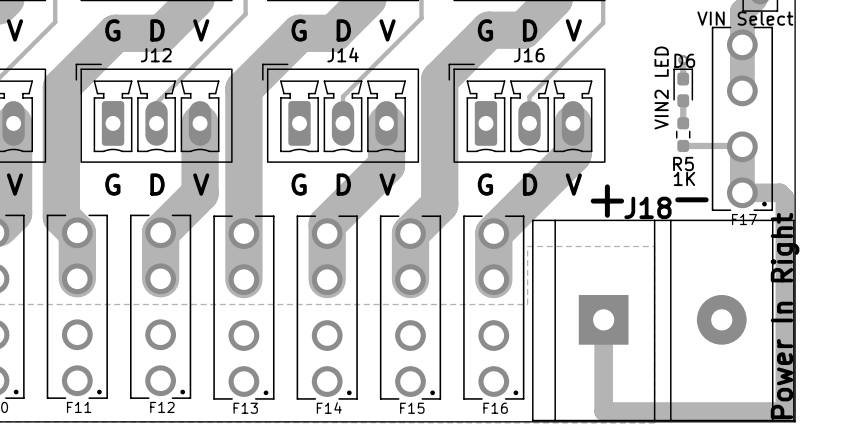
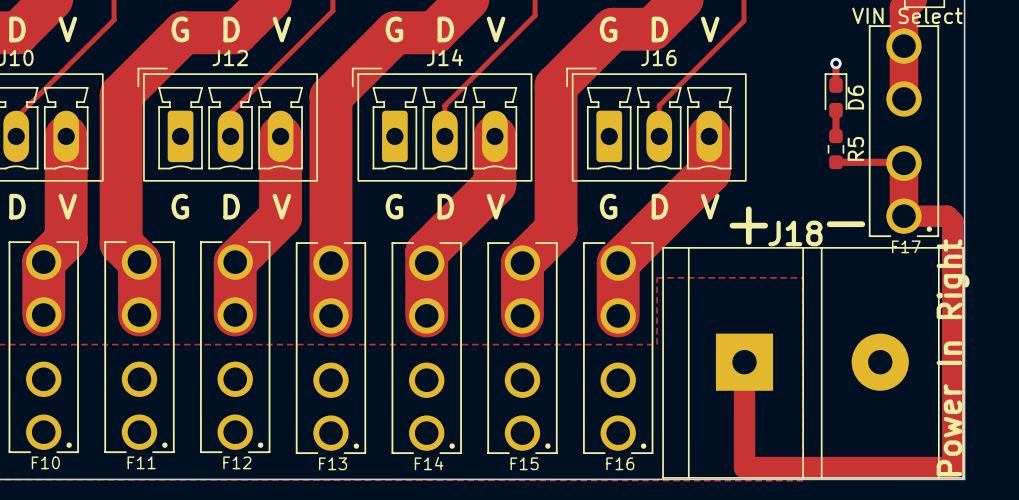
D6 name rotation: 0° (684, 60) -> 90° counterclockwise (855, 97)
D6 name position: D6 (684, 60) -> D6 (855, 97)
D6 value: VIN2 LED (661, 87) -> none
R5 name rotation: 0° (683, 163) -> 90° counterclockwise (855, 148)
R5 name position: R5 (683, 163) -> R5 (855, 148)
R5 value: 1K (684, 178) -> none

